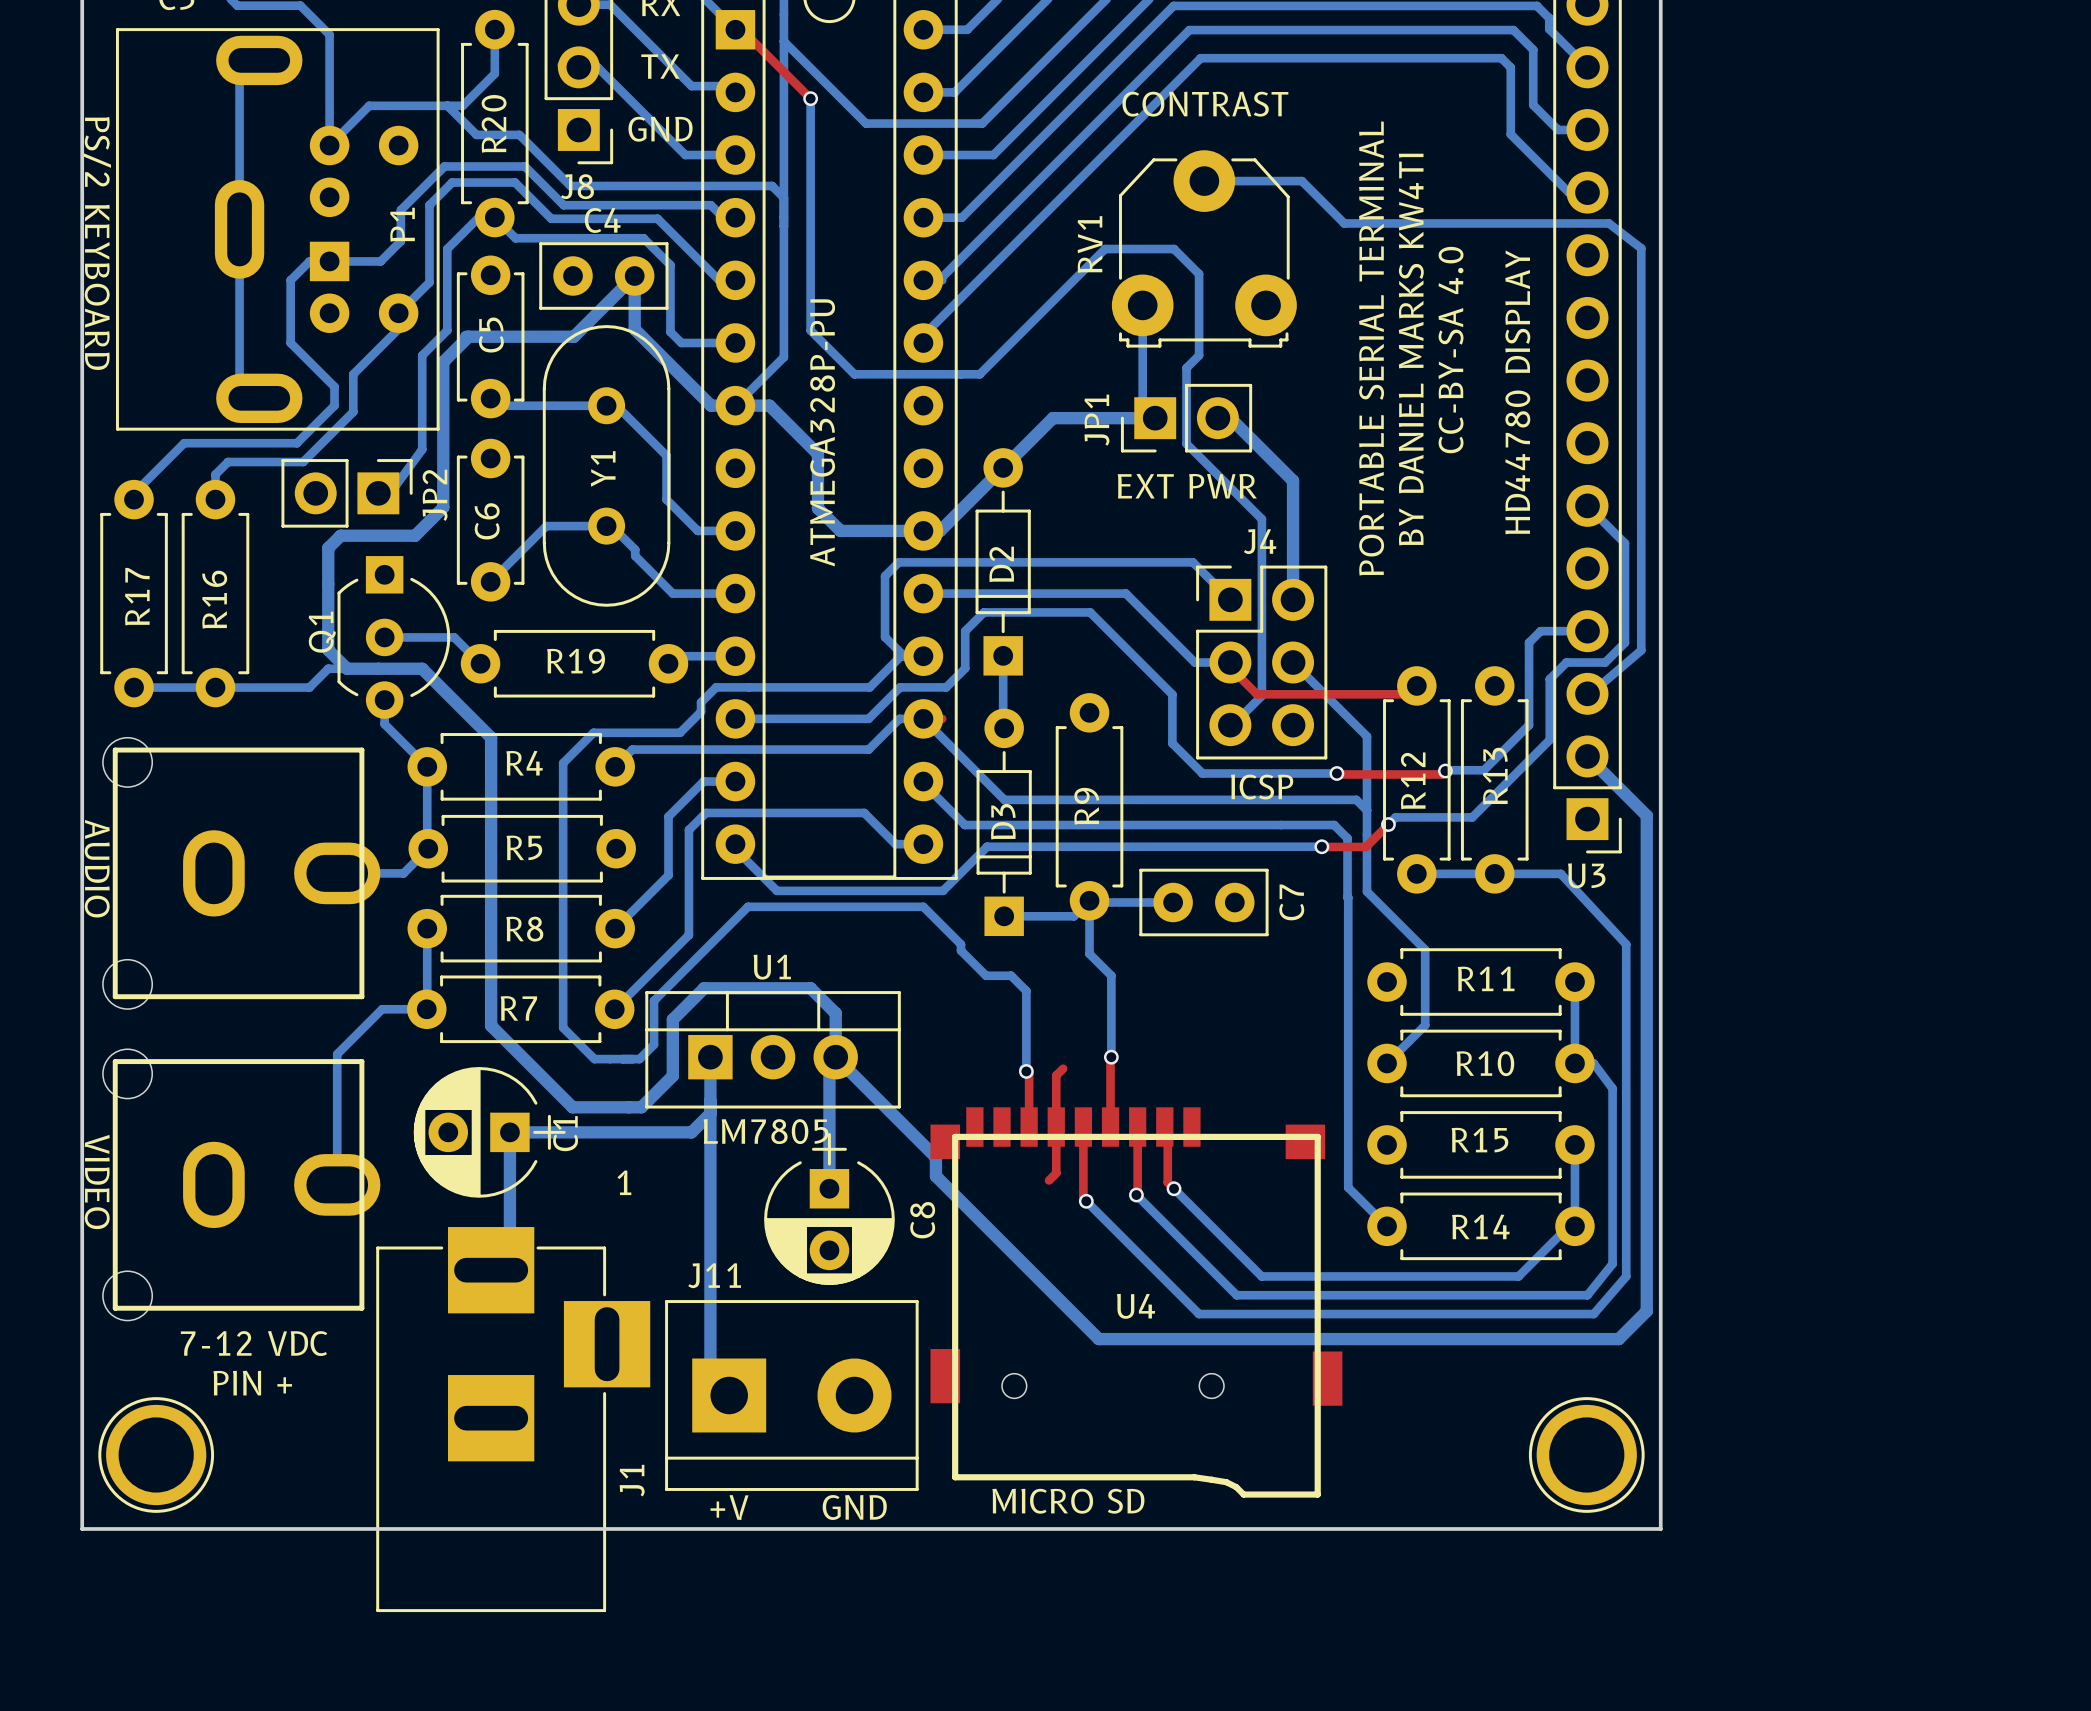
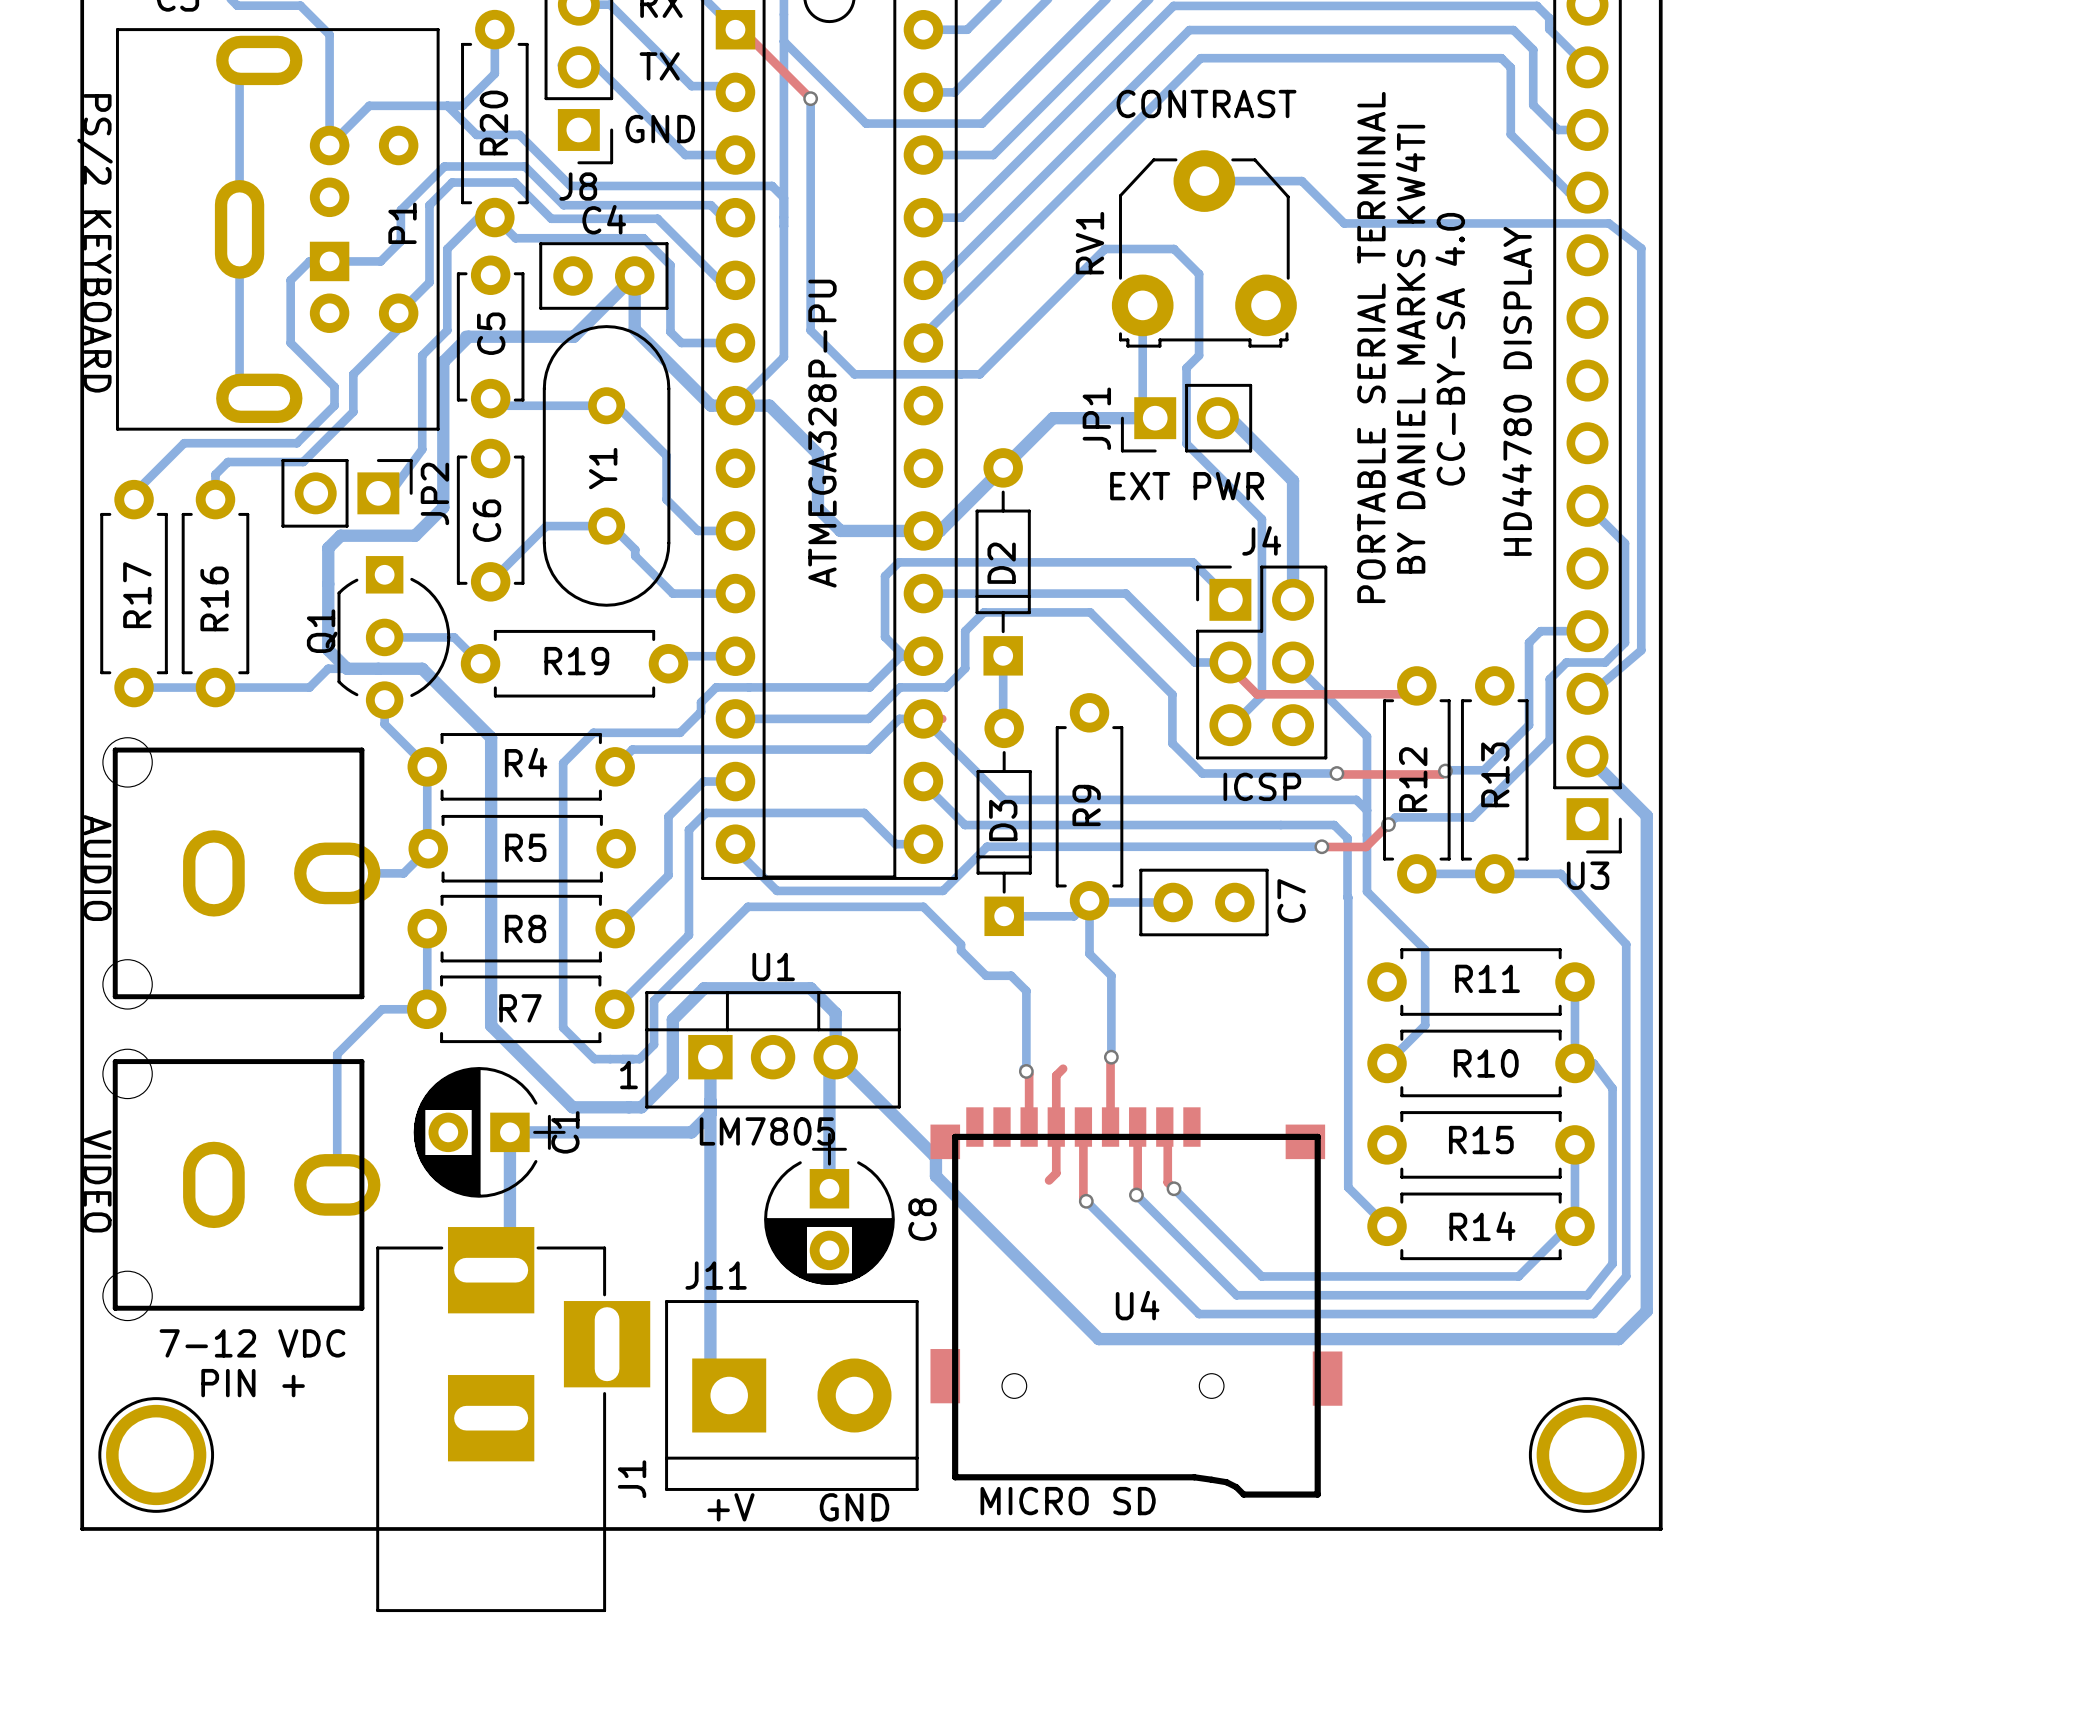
text position: 1 (624, 1182) -> 1 (628, 1075)

